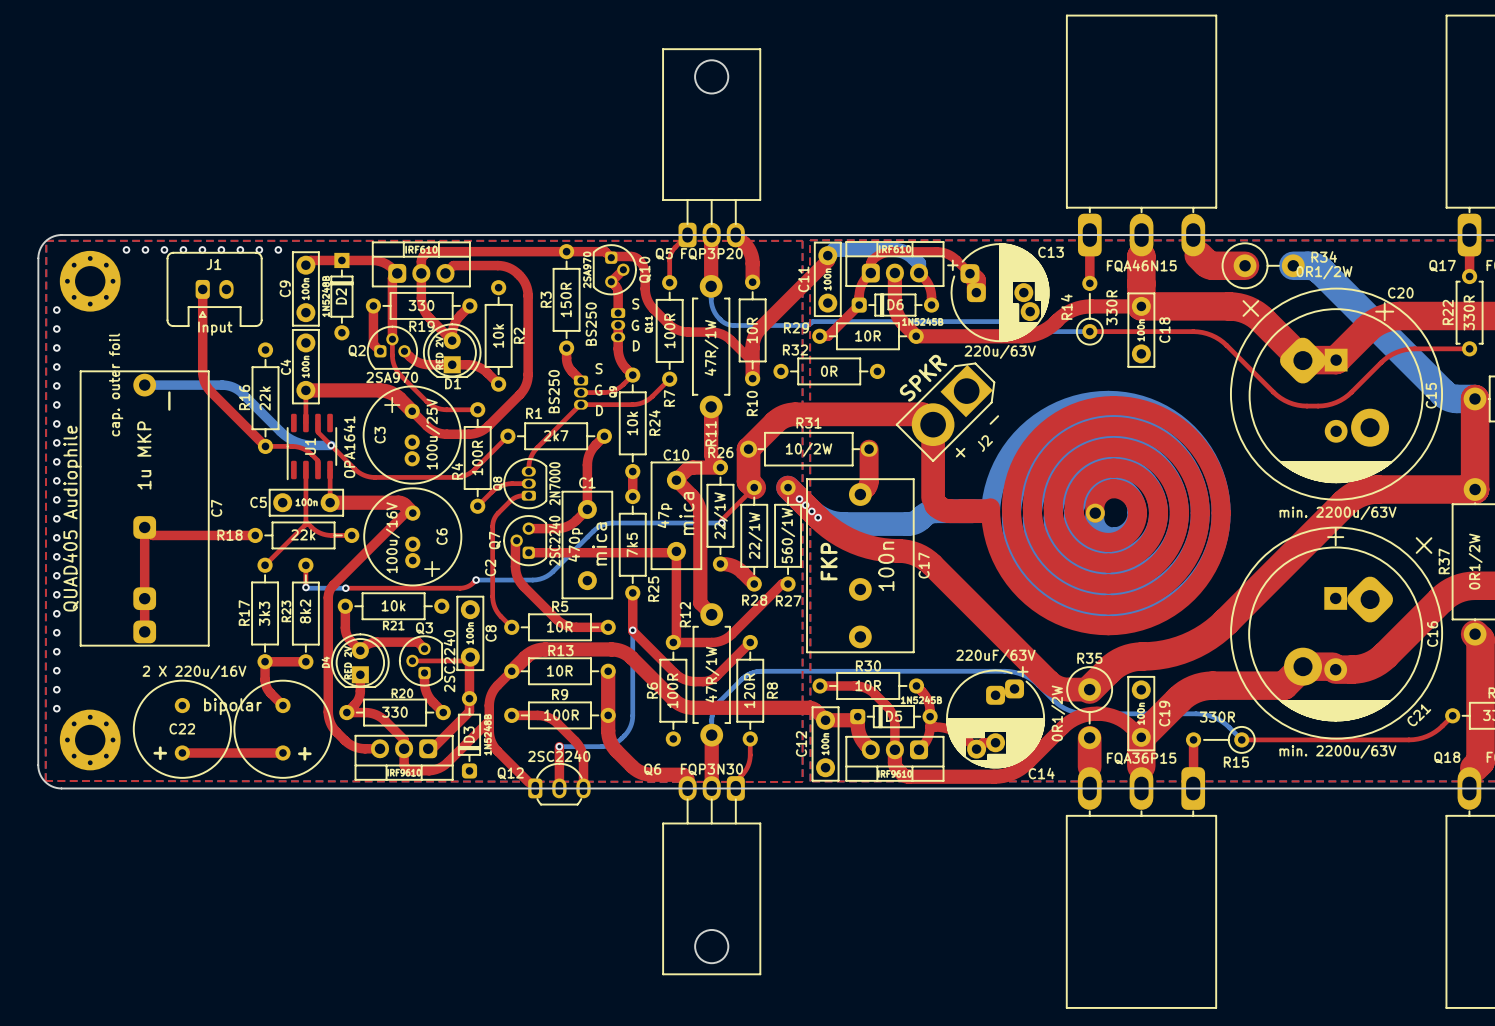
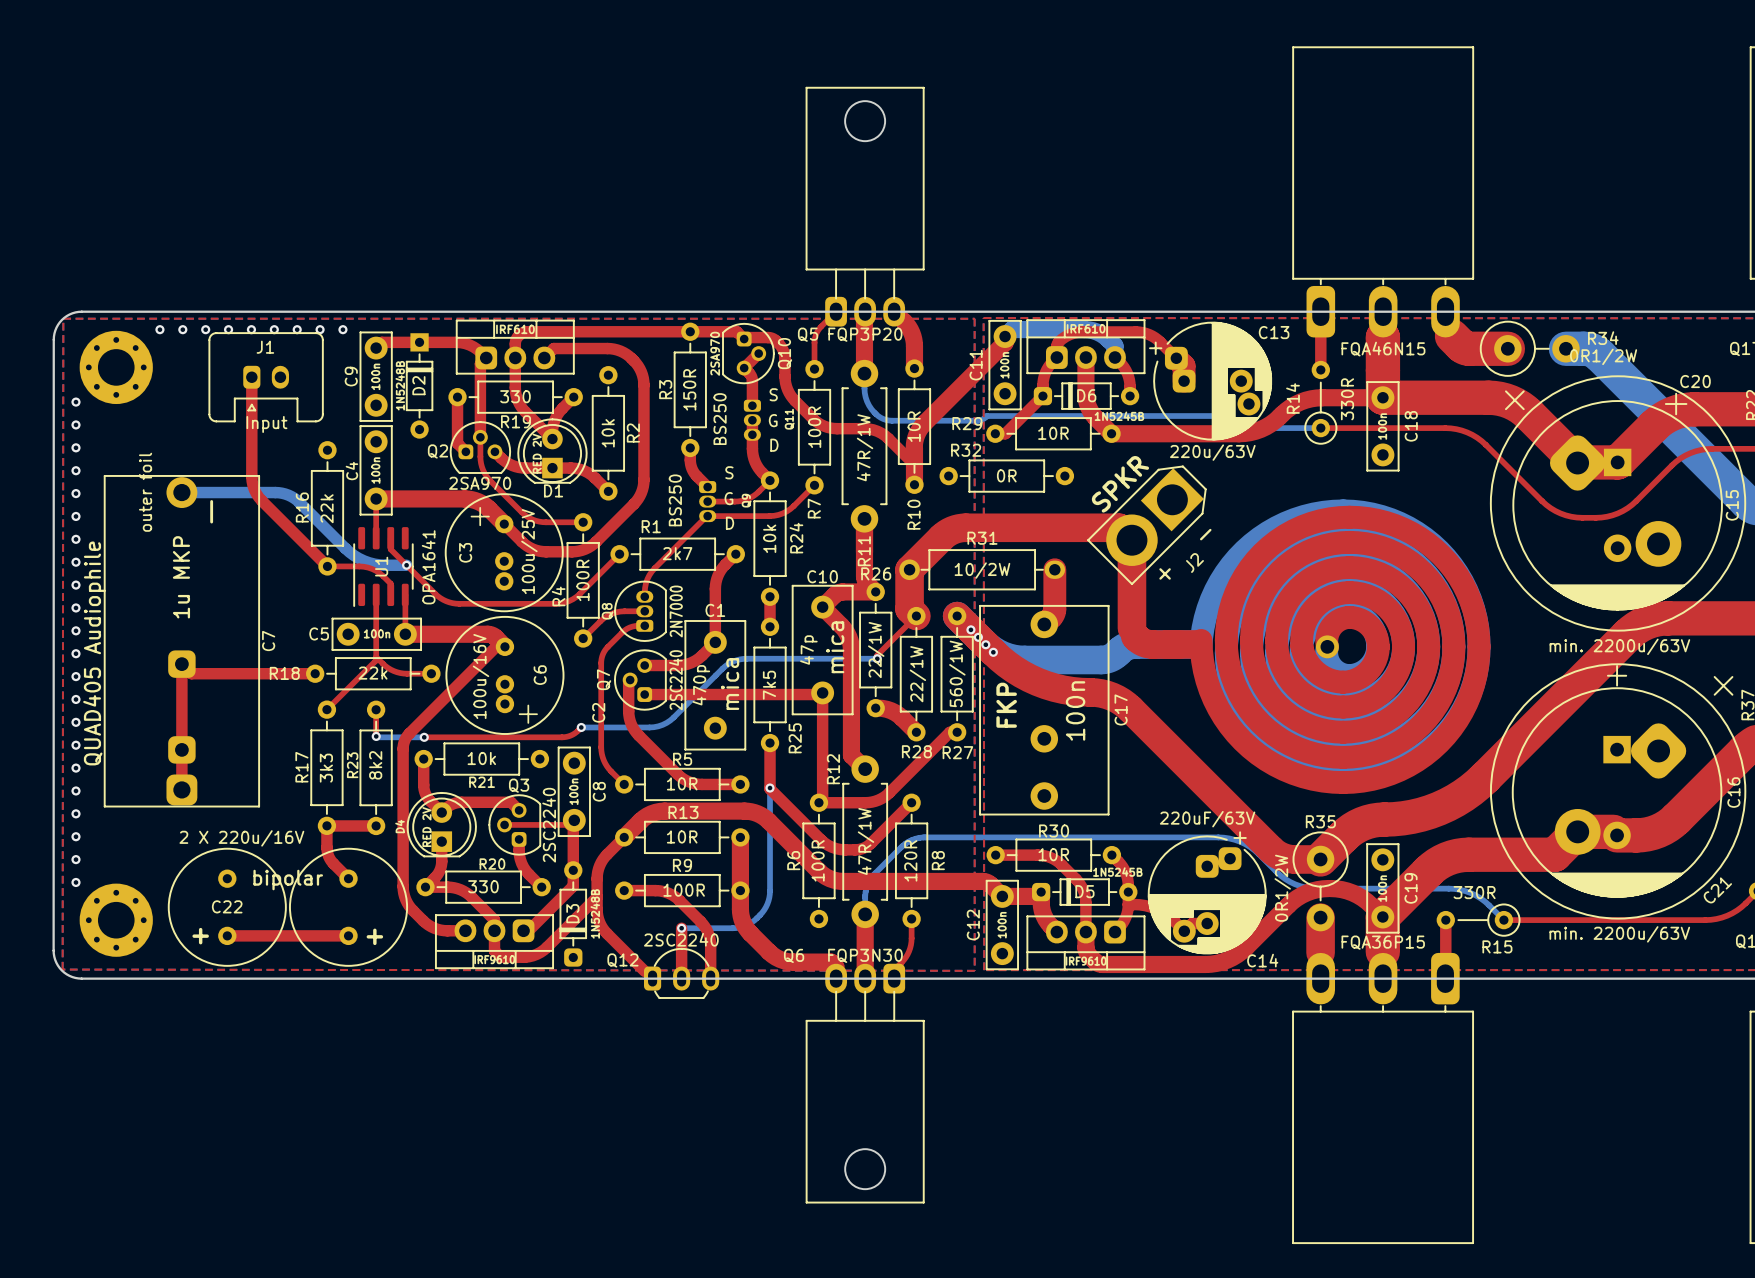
C7 footprint: [80, 371, 210, 646] -> [104, 475, 260, 807]

